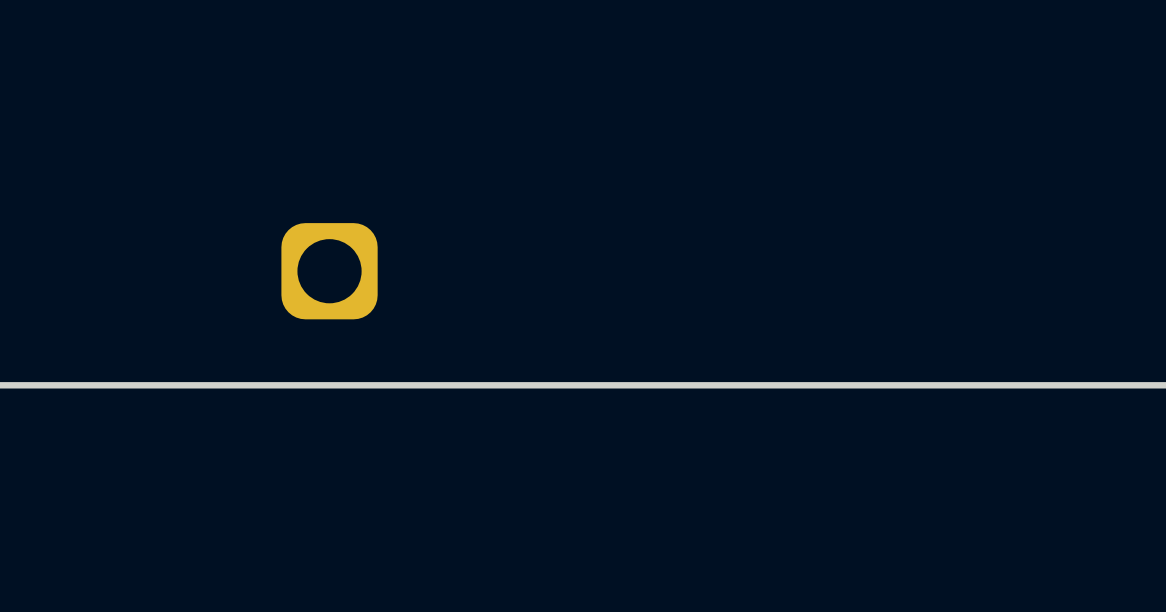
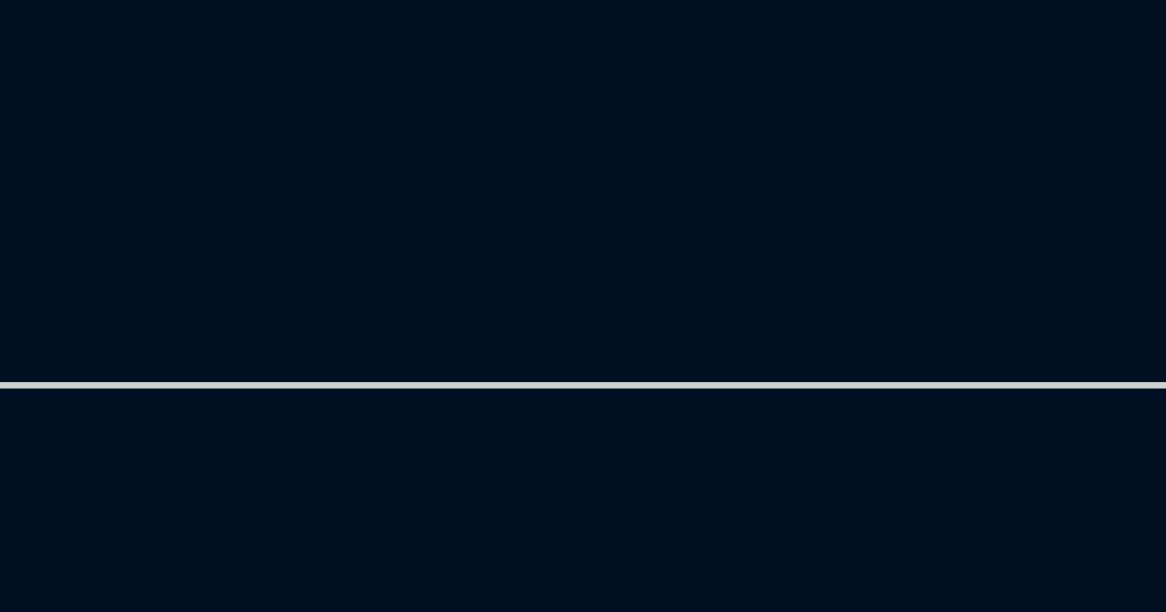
part: (329, 271) -> none

